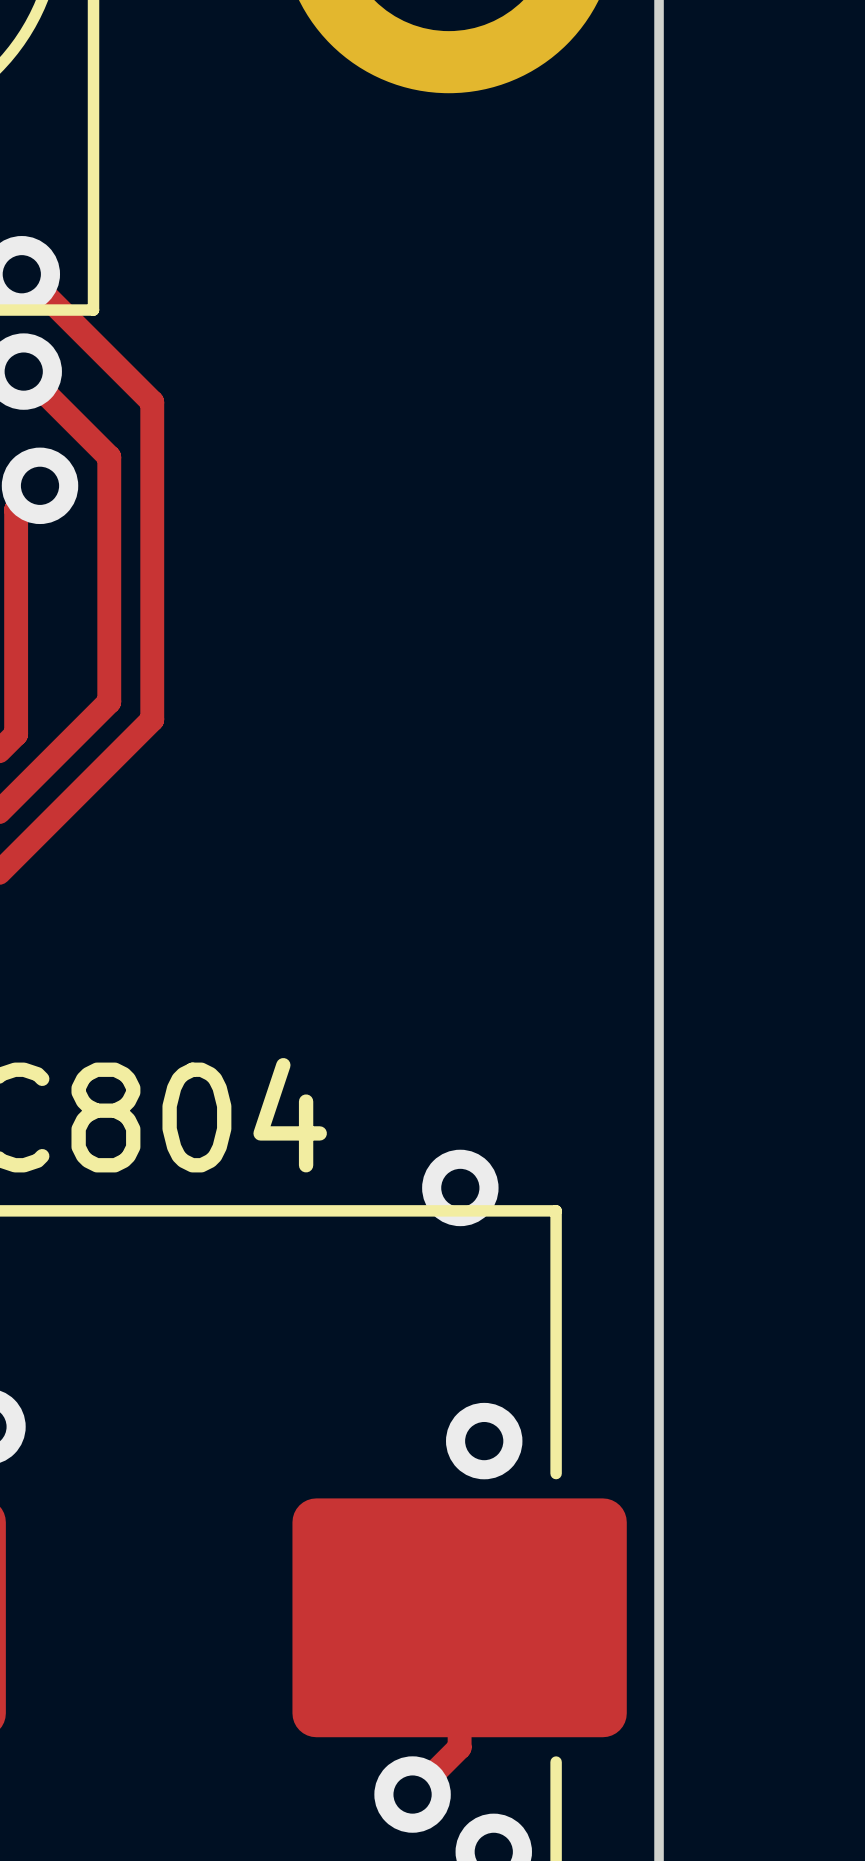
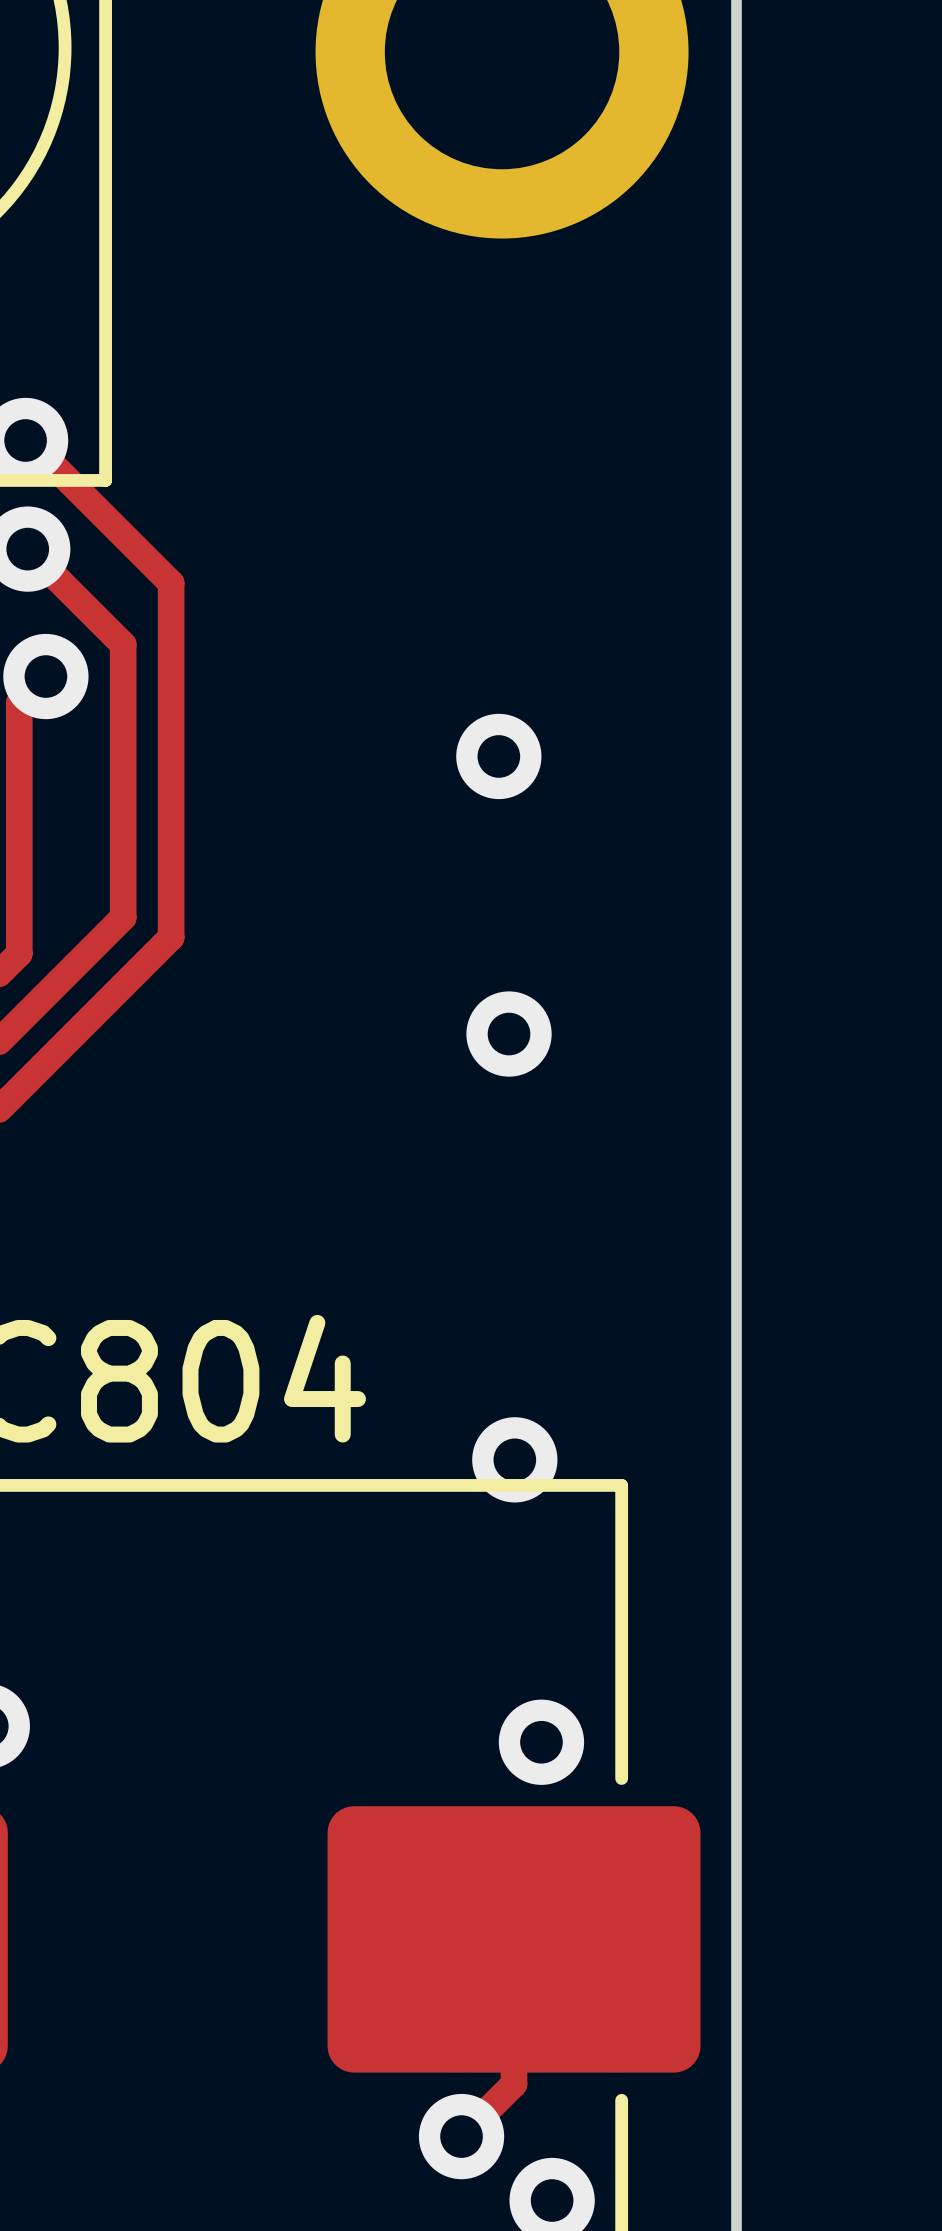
via: none -> (498, 756)
via: none -> (509, 1034)

